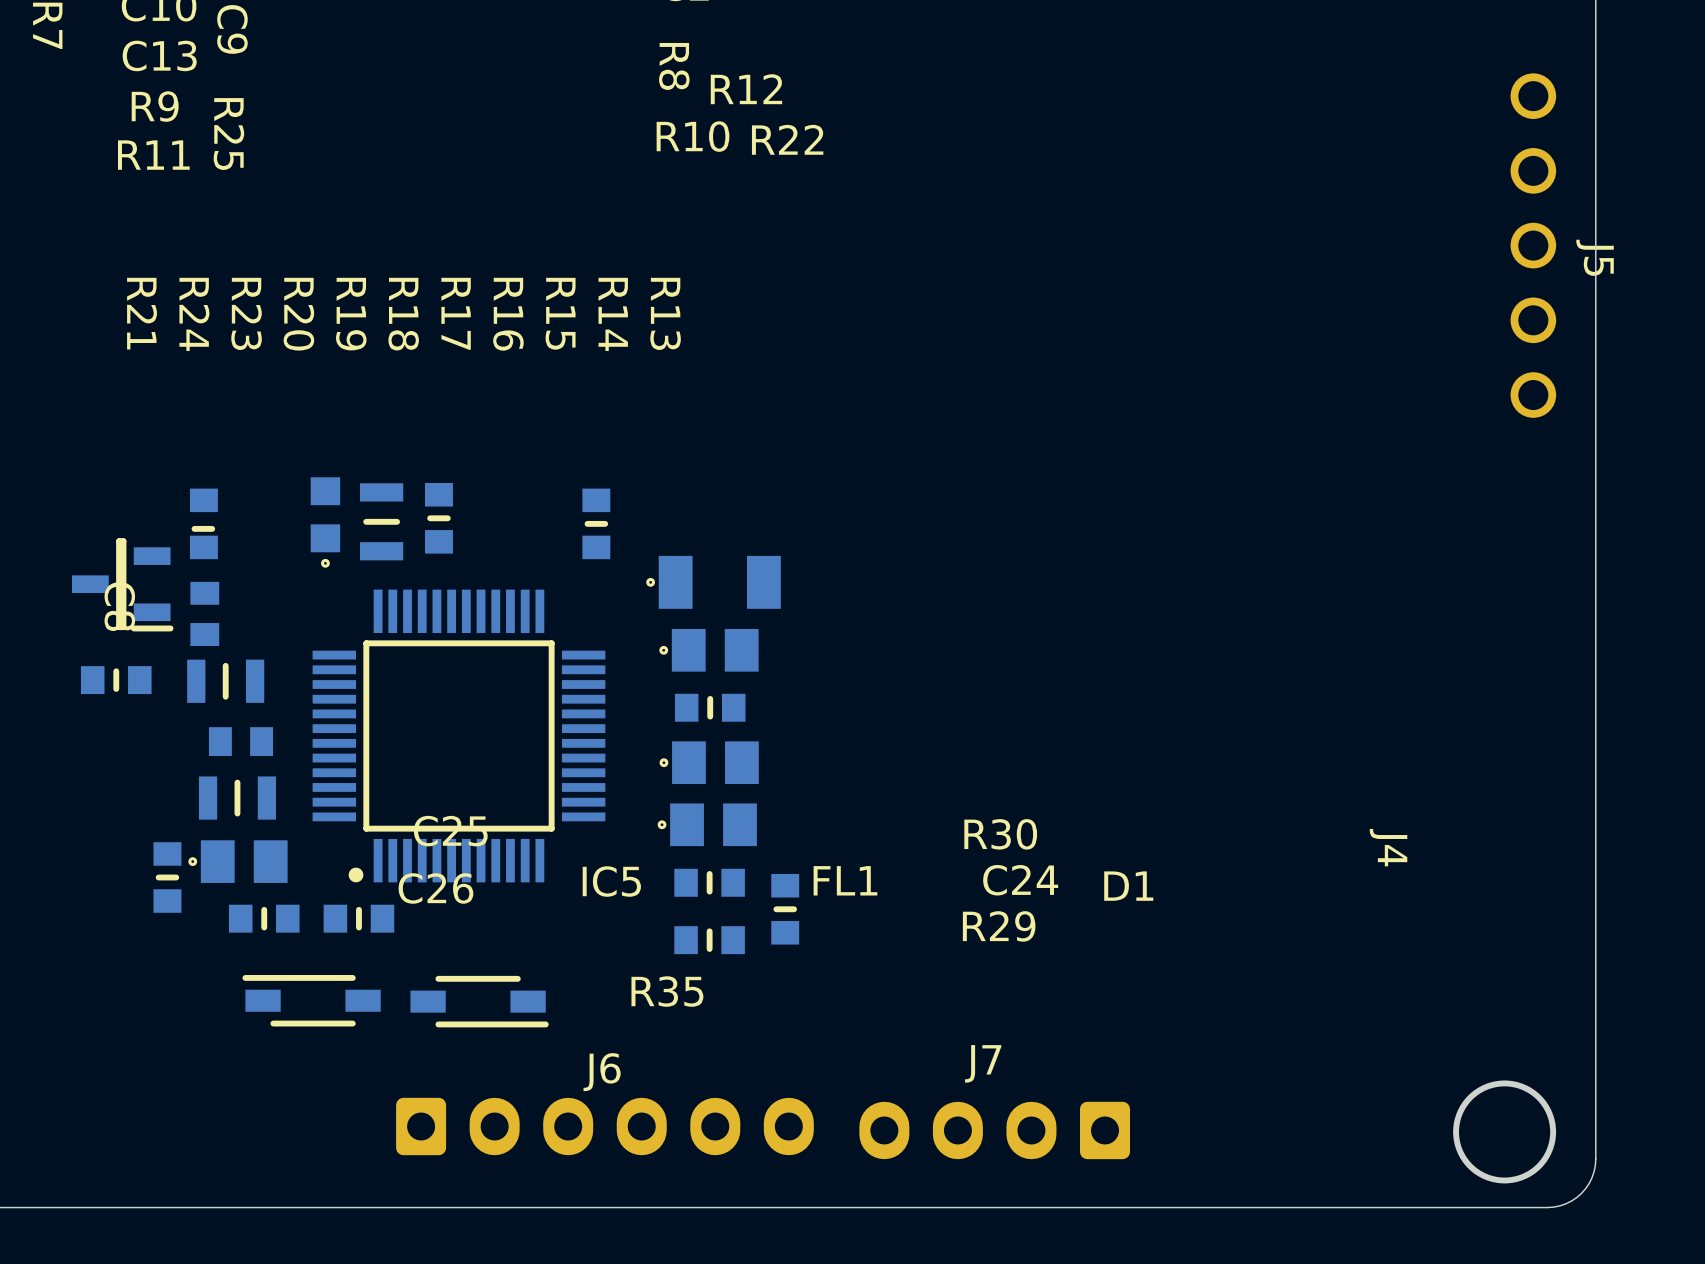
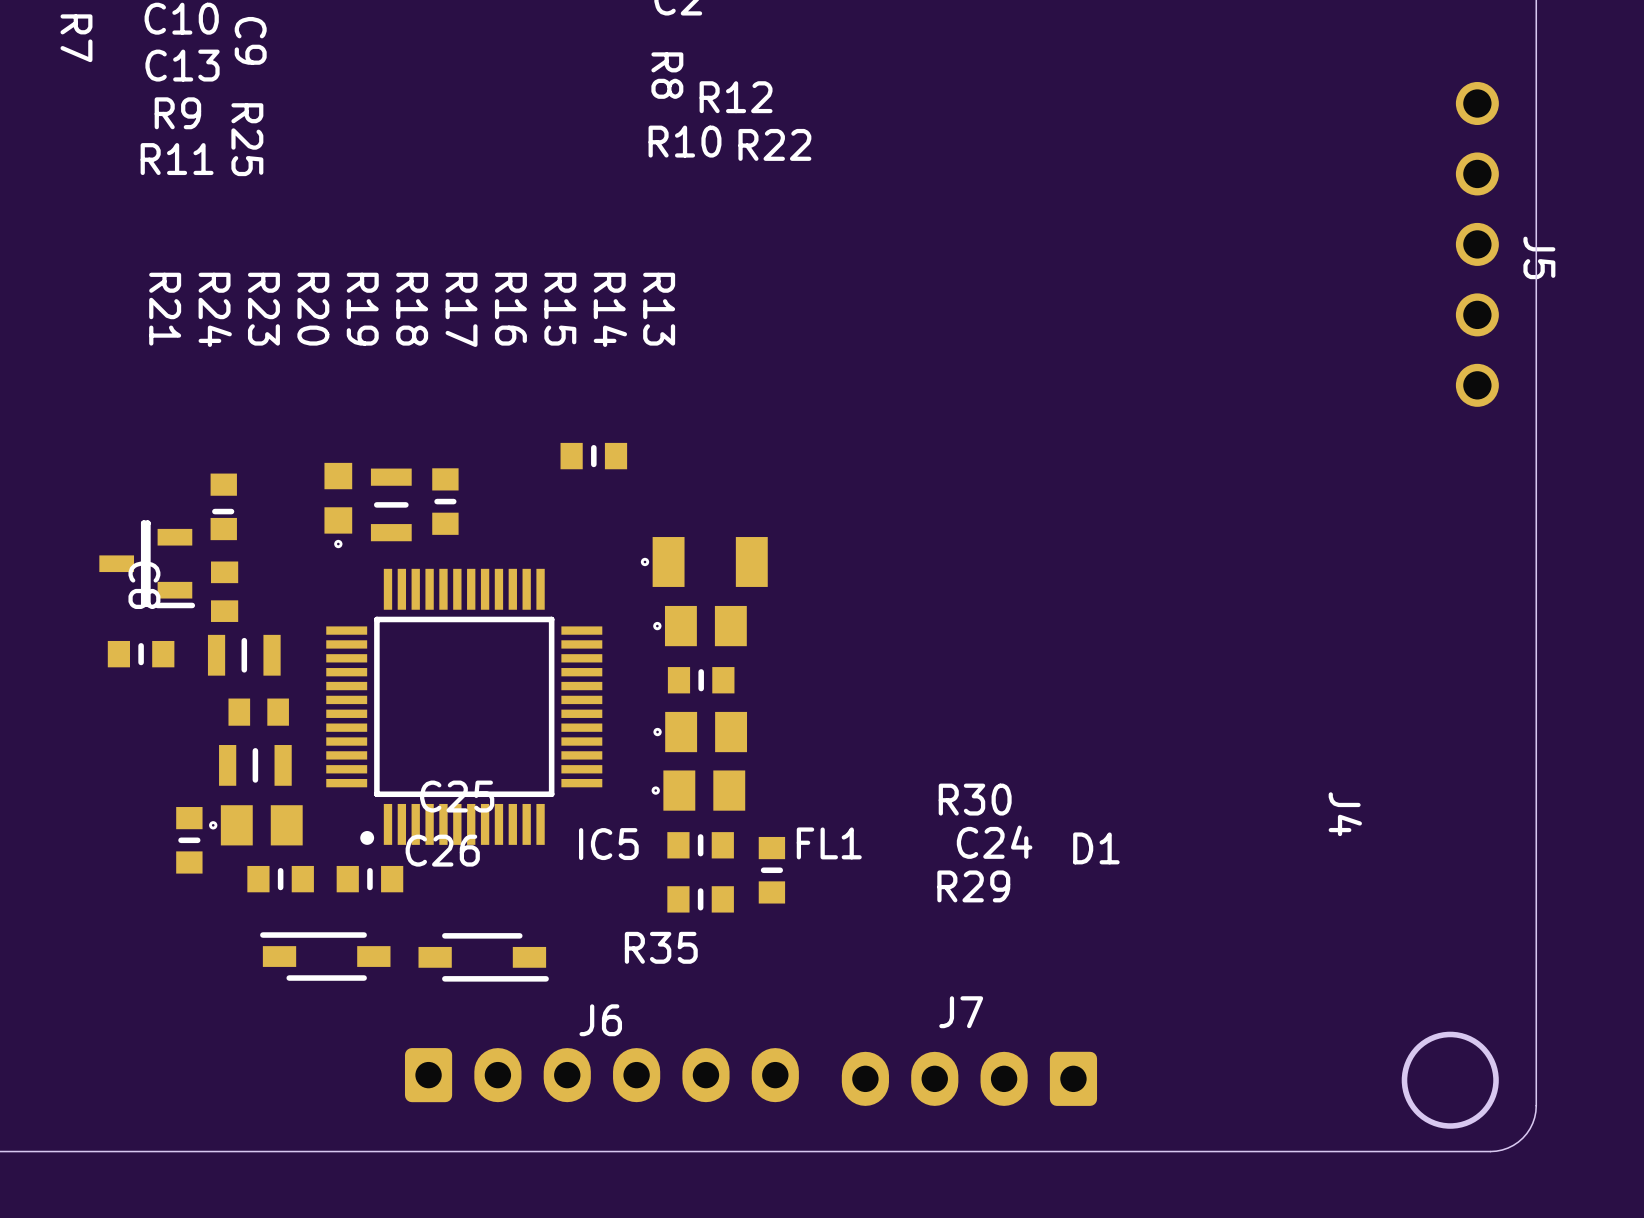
part rotation: 0° (596, 523) -> 90° clockwise (593, 456)
part position: (596, 523) -> (593, 456)

